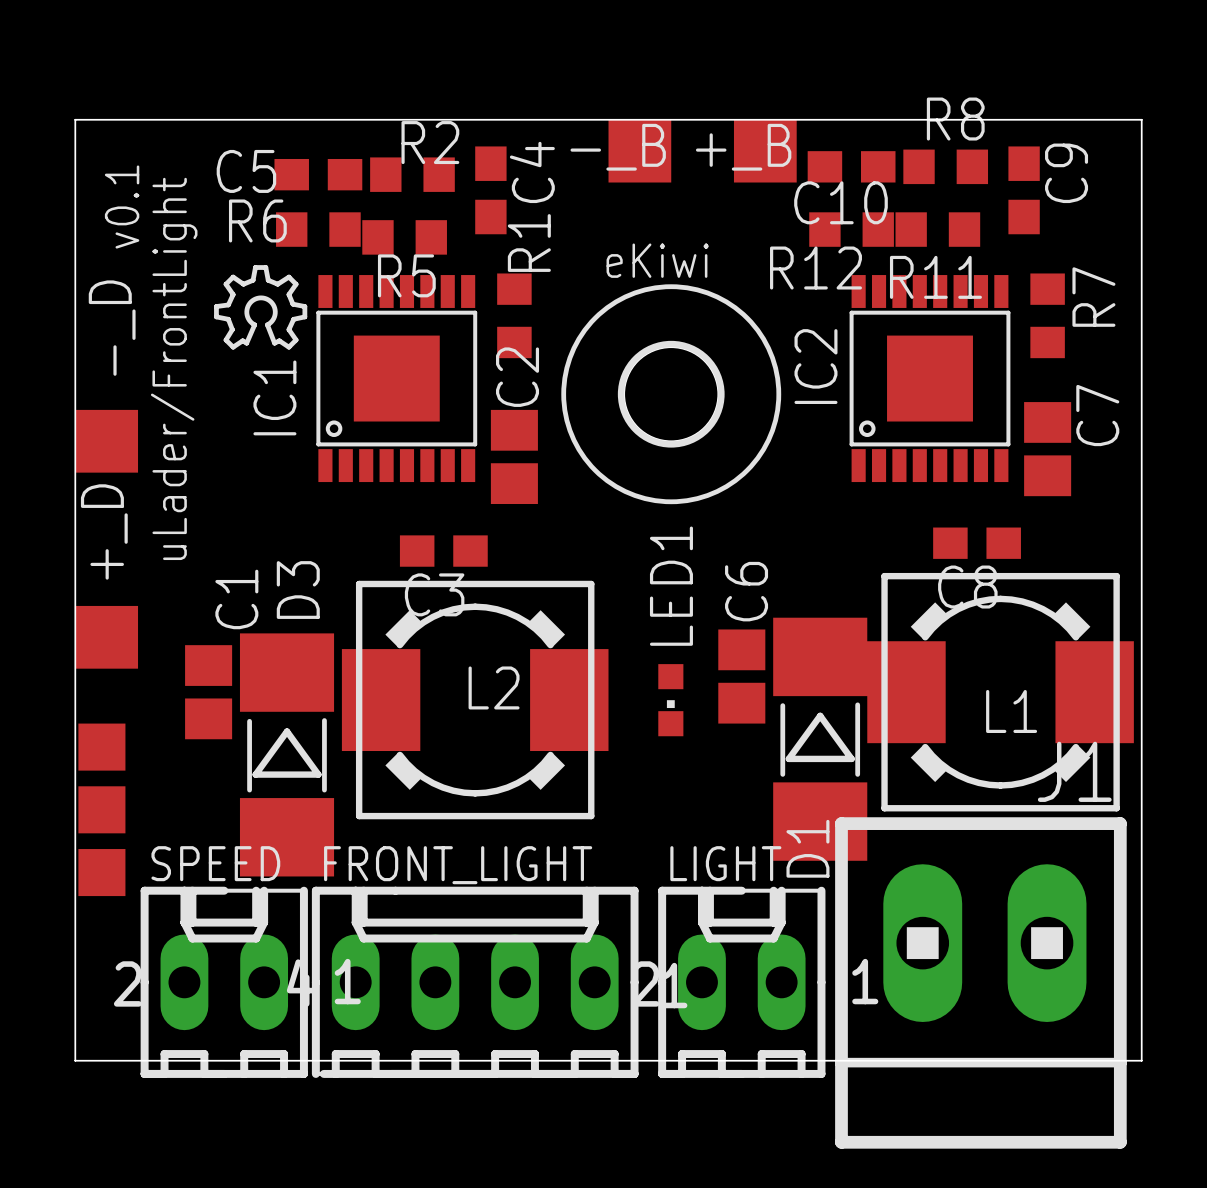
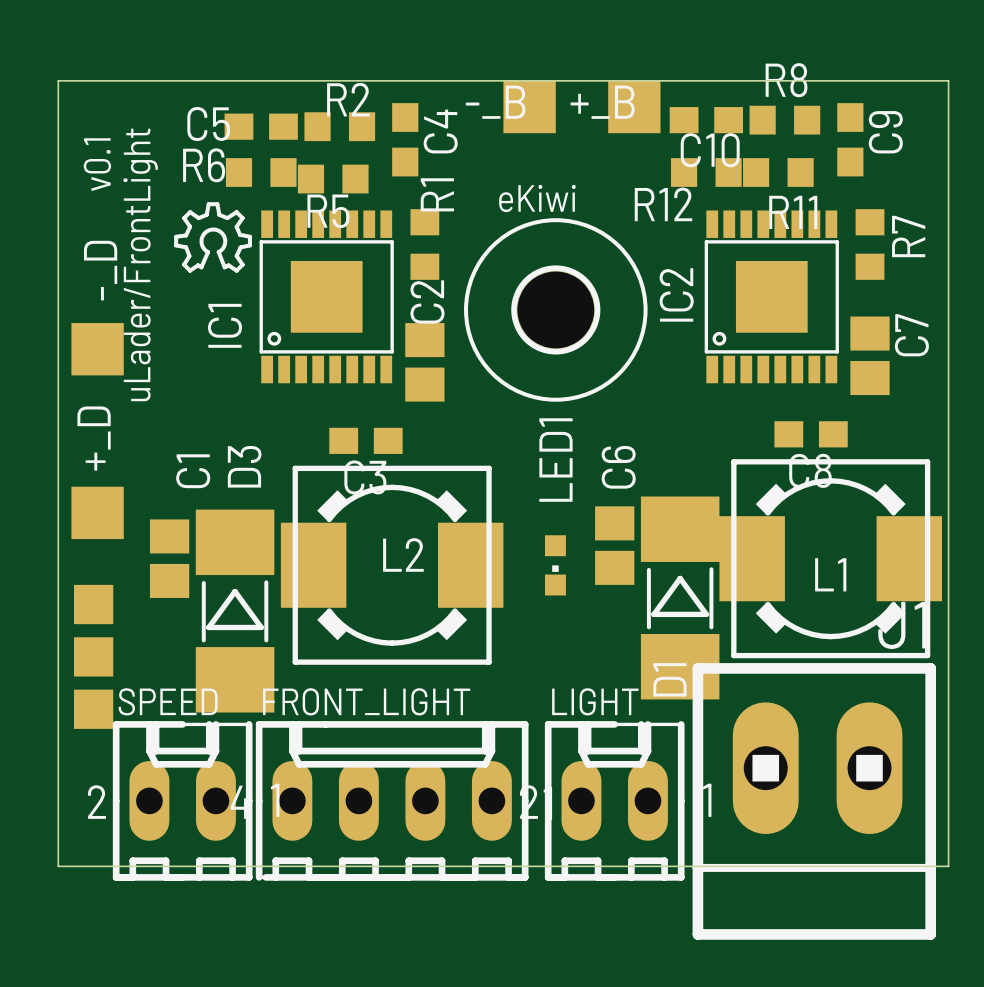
-_D position: (106, 441) -> (97, 349)
+_D position: (106, 637) -> (97, 512)
part position: (101, 809) -> (93, 656)

